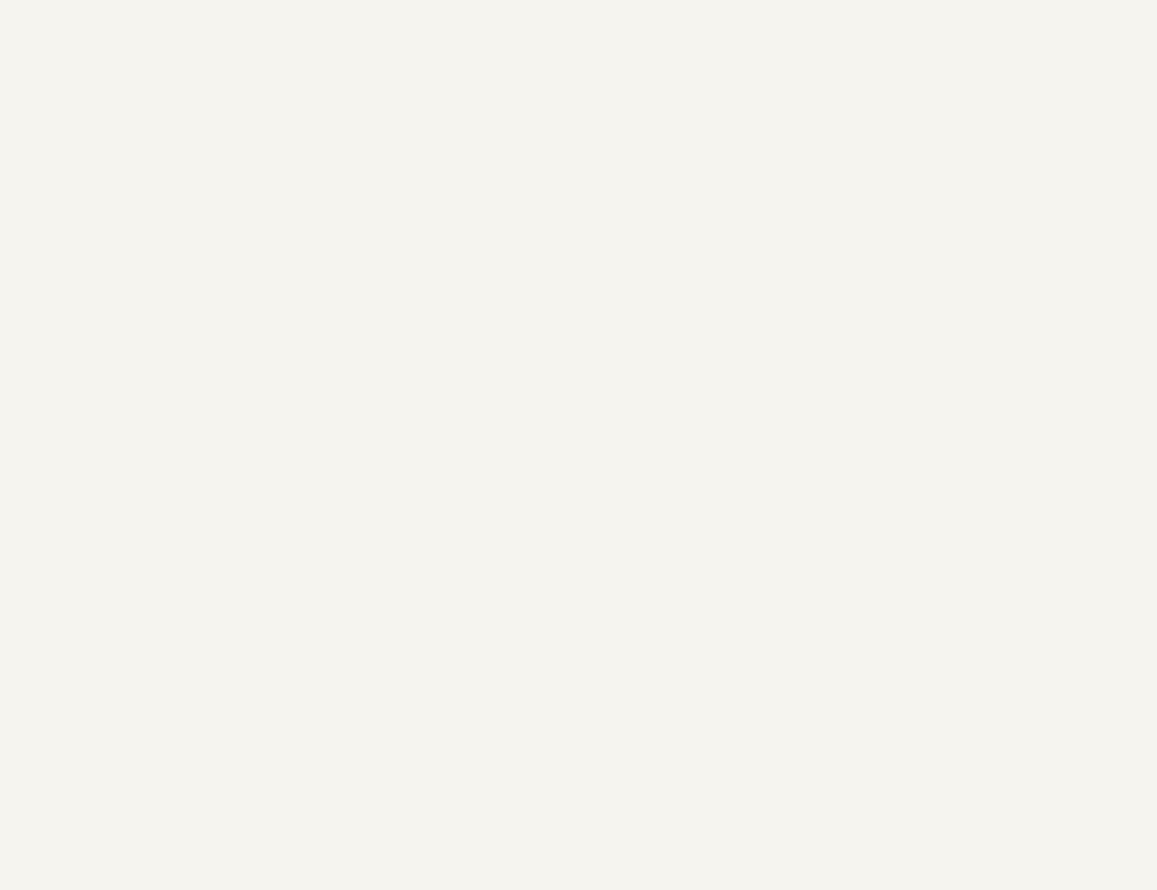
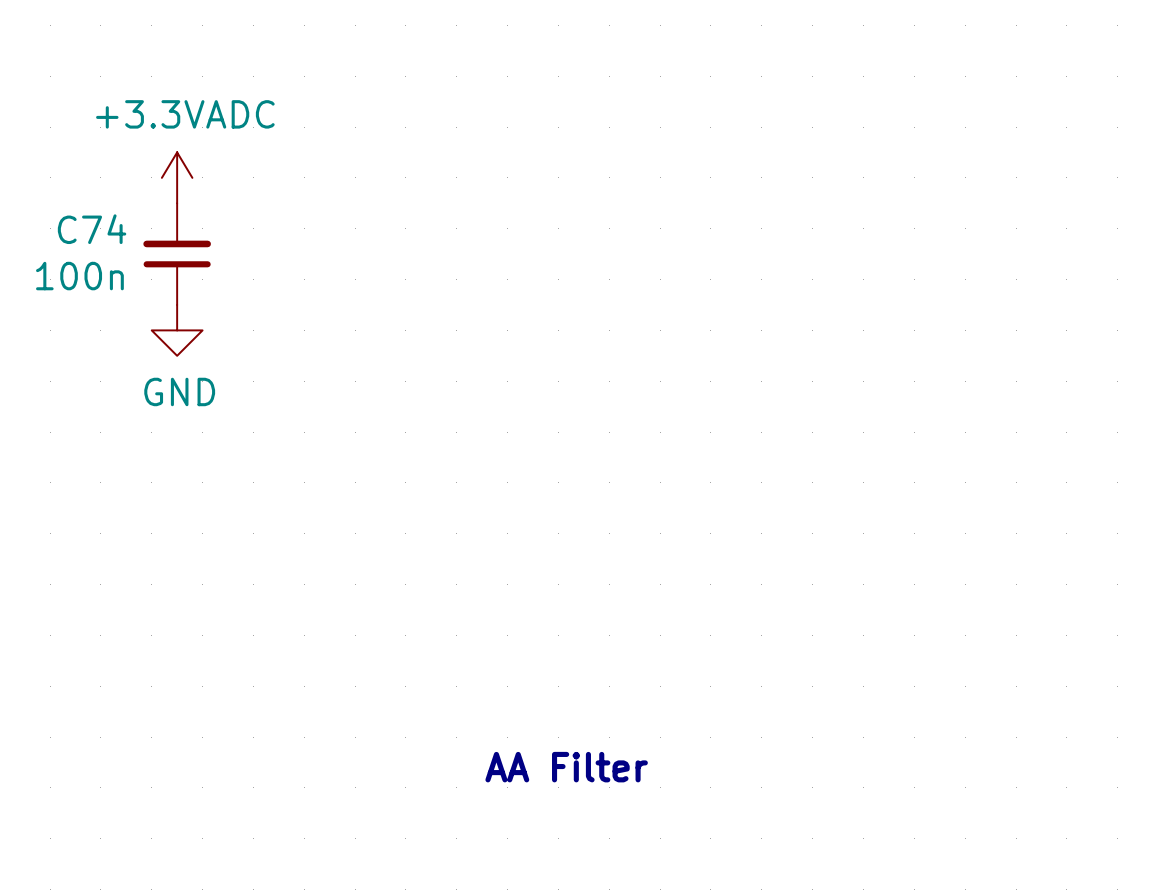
power symbol: none -> +3.3VADC (177, 177)
C74: none -> 100n (177, 254)
power symbol: none -> GND (177, 330)
text: none -> AA Filter (566, 767)

